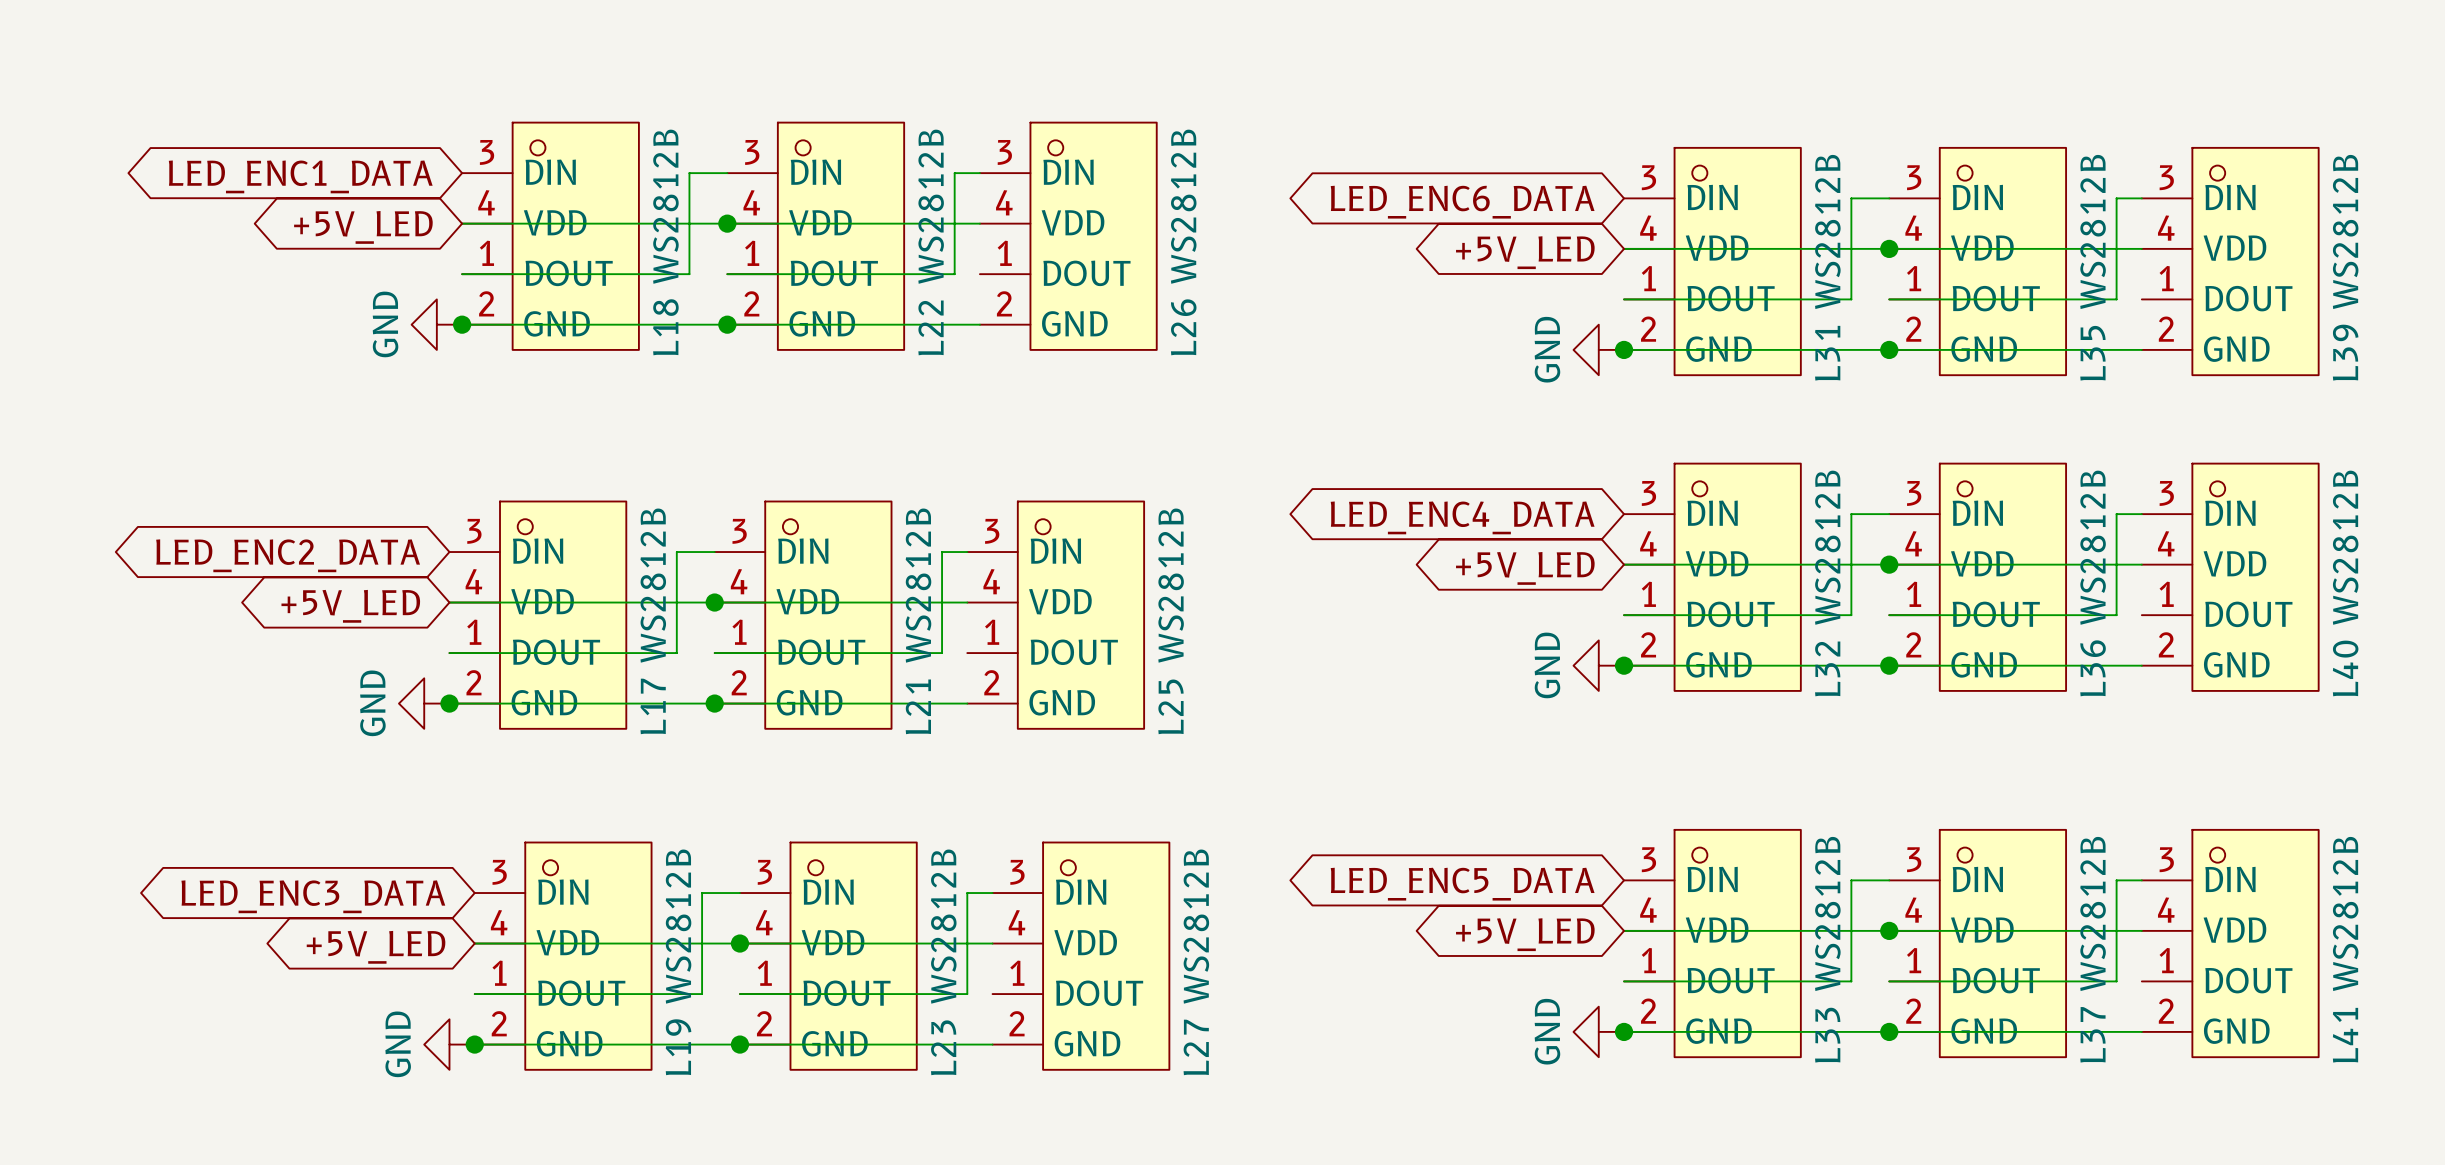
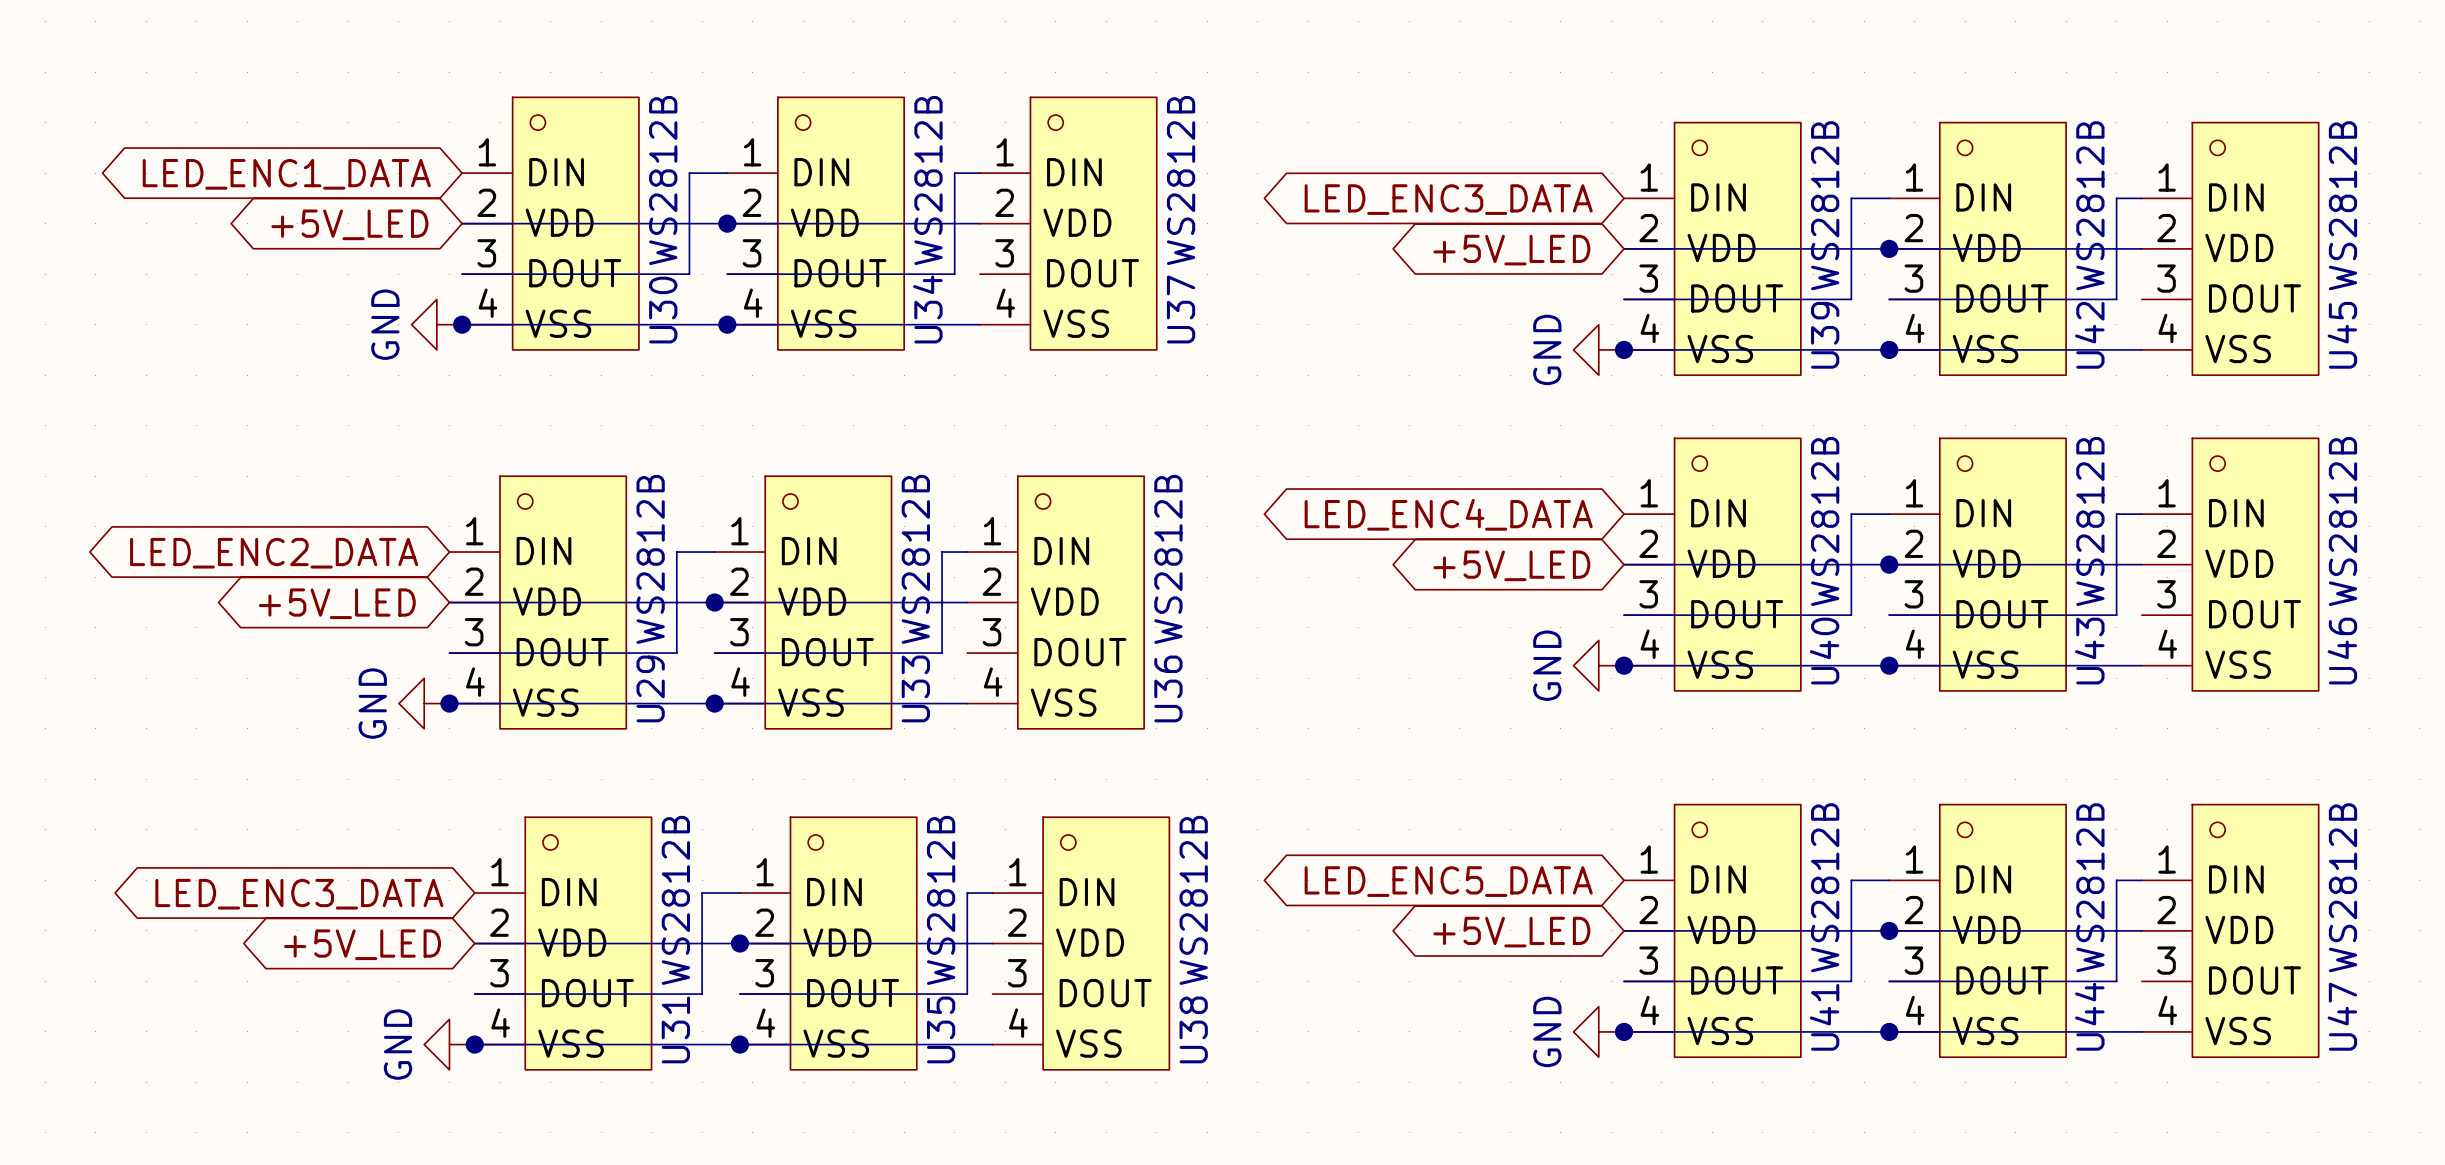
global label: LED_ENC6_DATA (1462, 202) -> LED_ENC3_DATA (1448, 199)
U30: none -> WS2812B (550, 223)
U34: none -> WS2812B (815, 223)
U37: none -> WS2812B (1068, 223)
L18: WS2812B (550, 236) -> none
L22: WS2812B (815, 236) -> none
L26: WS2812B (1068, 236) -> none
U39: none -> WS2812B (1712, 248)
U42: none -> WS2812B (1977, 248)
U45: none -> WS2812B (2230, 248)
L31: WS2812B (1712, 261) -> none
L35: WS2812B (1977, 261) -> none
L39: WS2812B (2230, 261) -> none
U40: none -> WS2812B (1712, 564)
U43: none -> WS2812B (1977, 564)
U46: none -> WS2812B (2230, 564)
L32: WS2812B (1712, 577) -> none
L36: WS2812B (1977, 577) -> none
L40: WS2812B (2230, 577) -> none
U29: none -> WS2812B (537, 602)
U33: none -> WS2812B (803, 602)
U36: none -> WS2812B (1055, 602)
L17: WS2812B (537, 615) -> none
L21: WS2812B (803, 615) -> none
L25: WS2812B (1055, 615) -> none
U41: none -> WS2812B (1712, 930)
U44: none -> WS2812B (1977, 930)
U47: none -> WS2812B (2230, 930)
U31: none -> WS2812B (563, 943)
U35: none -> WS2812B (828, 943)
U38: none -> WS2812B (1080, 943)
L33: WS2812B (1712, 943) -> none
L37: WS2812B (1977, 943) -> none
L41: WS2812B (2230, 943) -> none
L19: WS2812B (563, 956) -> none
L23: WS2812B (828, 956) -> none
L27: WS2812B (1080, 956) -> none

